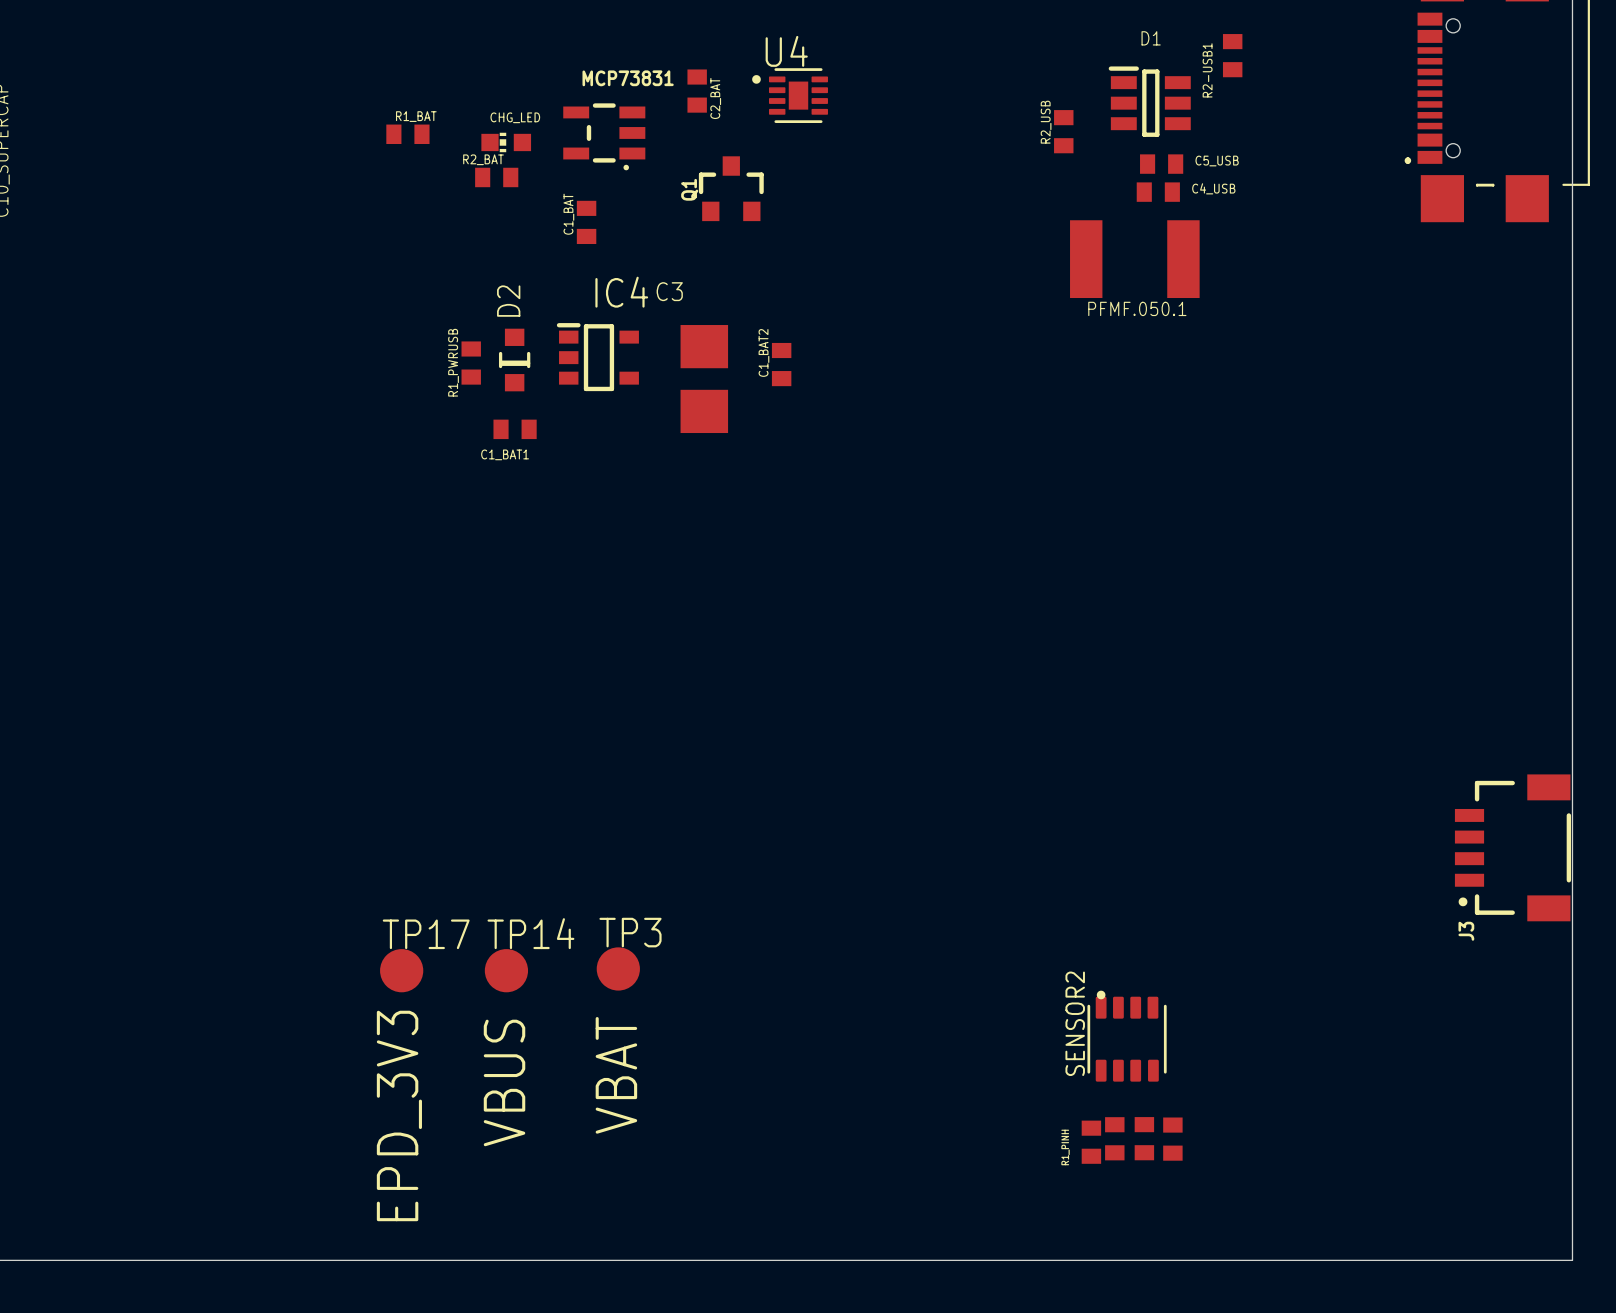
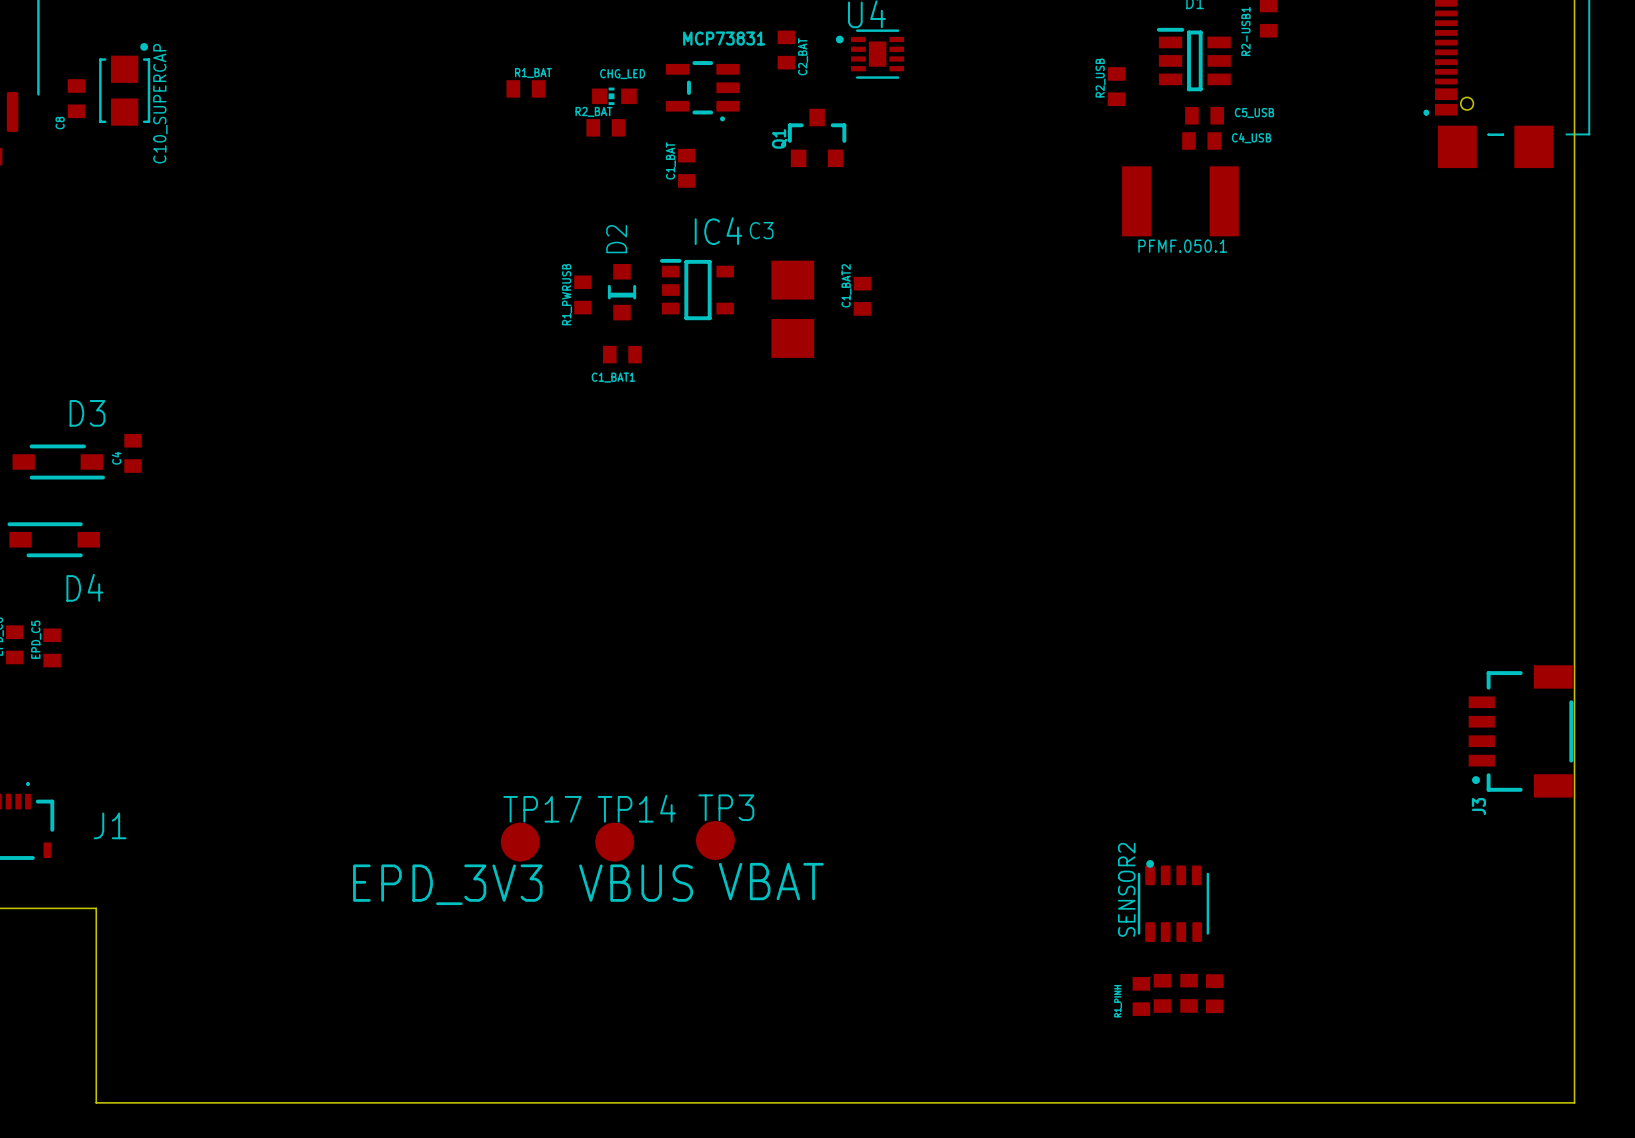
TP3 text rotation: 0° (616, 1075) -> 90° clockwise (771, 881)
TP14 text rotation: 0° (504, 1082) -> 90° clockwise (636, 883)
TP17 text rotation: 0° (399, 1115) -> 90° clockwise (447, 884)

